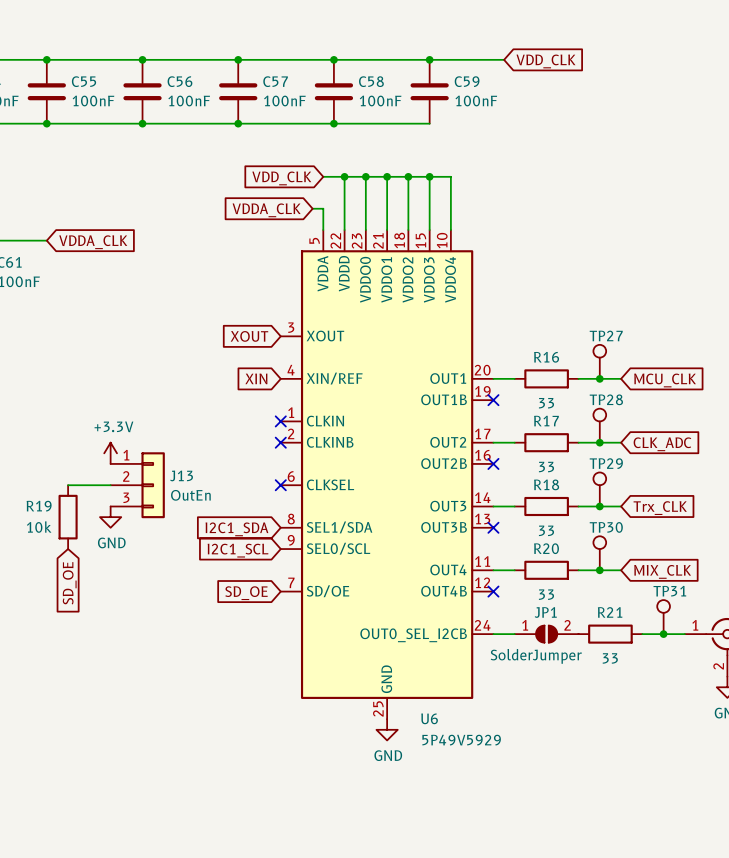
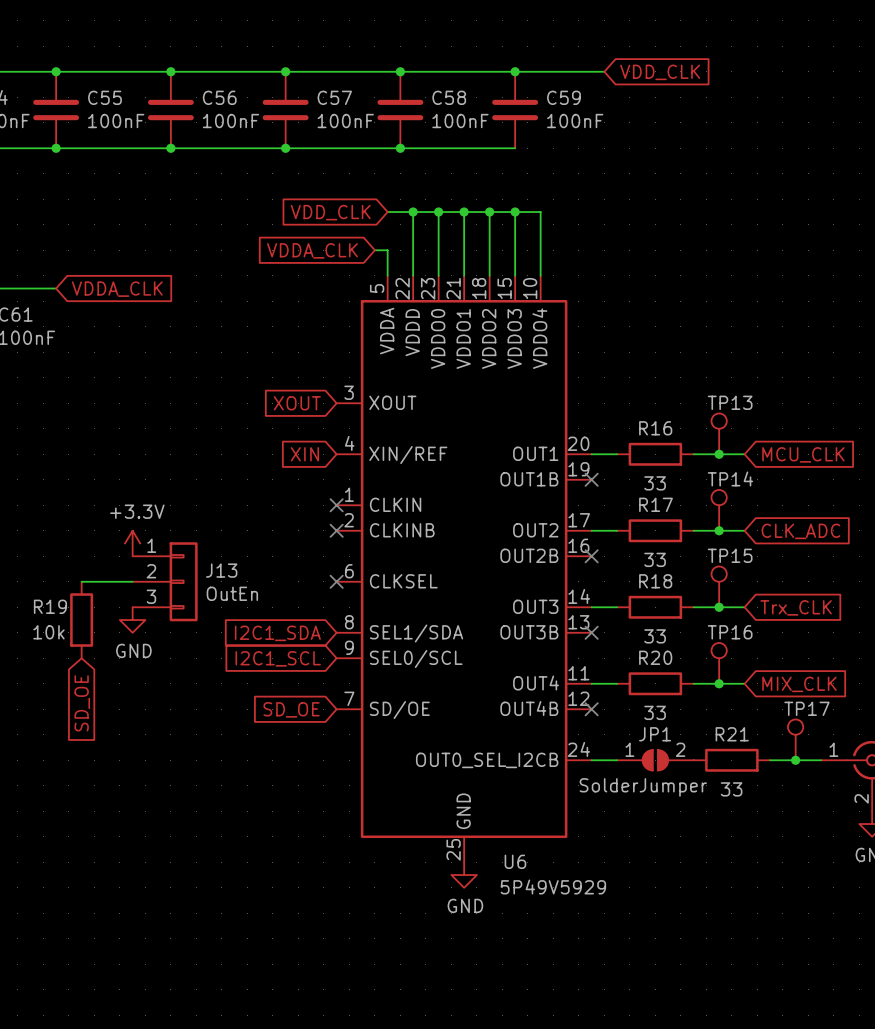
TP27 name: TP27 (606, 335) -> TP13 (730, 402)
TP28 name: TP28 (606, 399) -> TP14 (730, 478)
TP29 name: TP29 (606, 463) -> TP15 (730, 555)
TP30 name: TP30 (606, 527) -> TP16 (730, 632)
TP31 name: TP31 (669, 591) -> TP17 (806, 708)

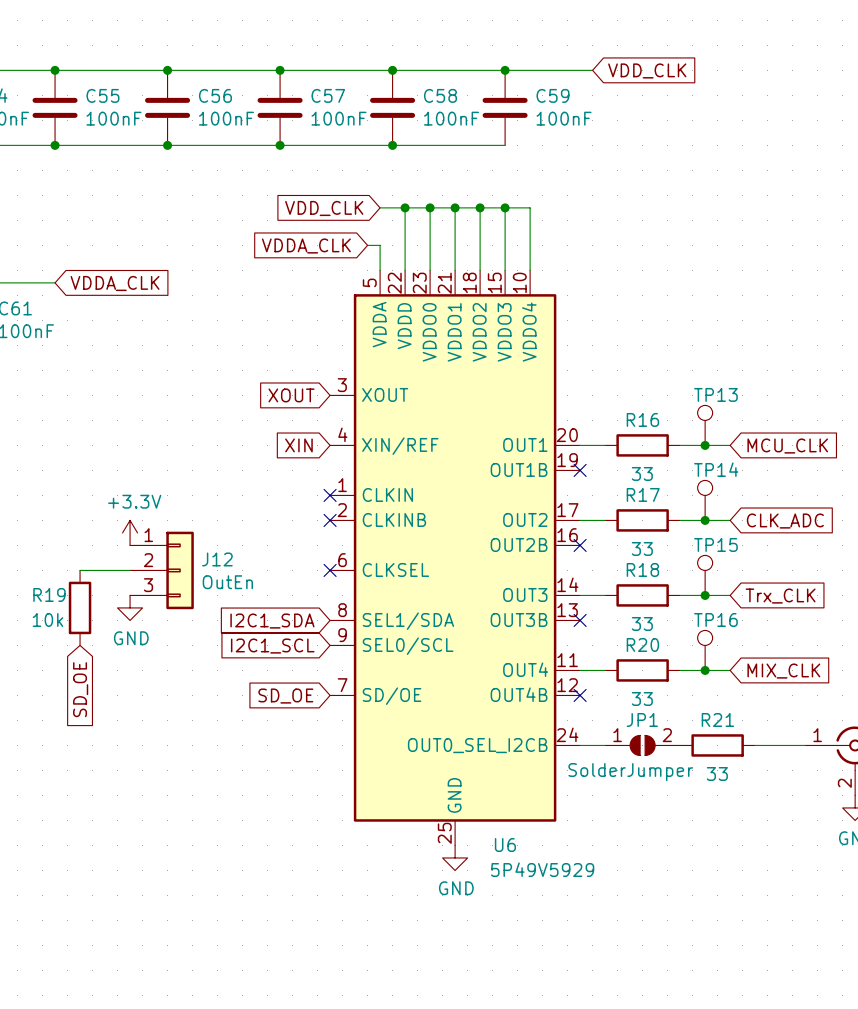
J13 name: J13 (221, 570) -> J12 (217, 559)
TP17: (795, 739) -> none
junction: (795, 760) -> none

